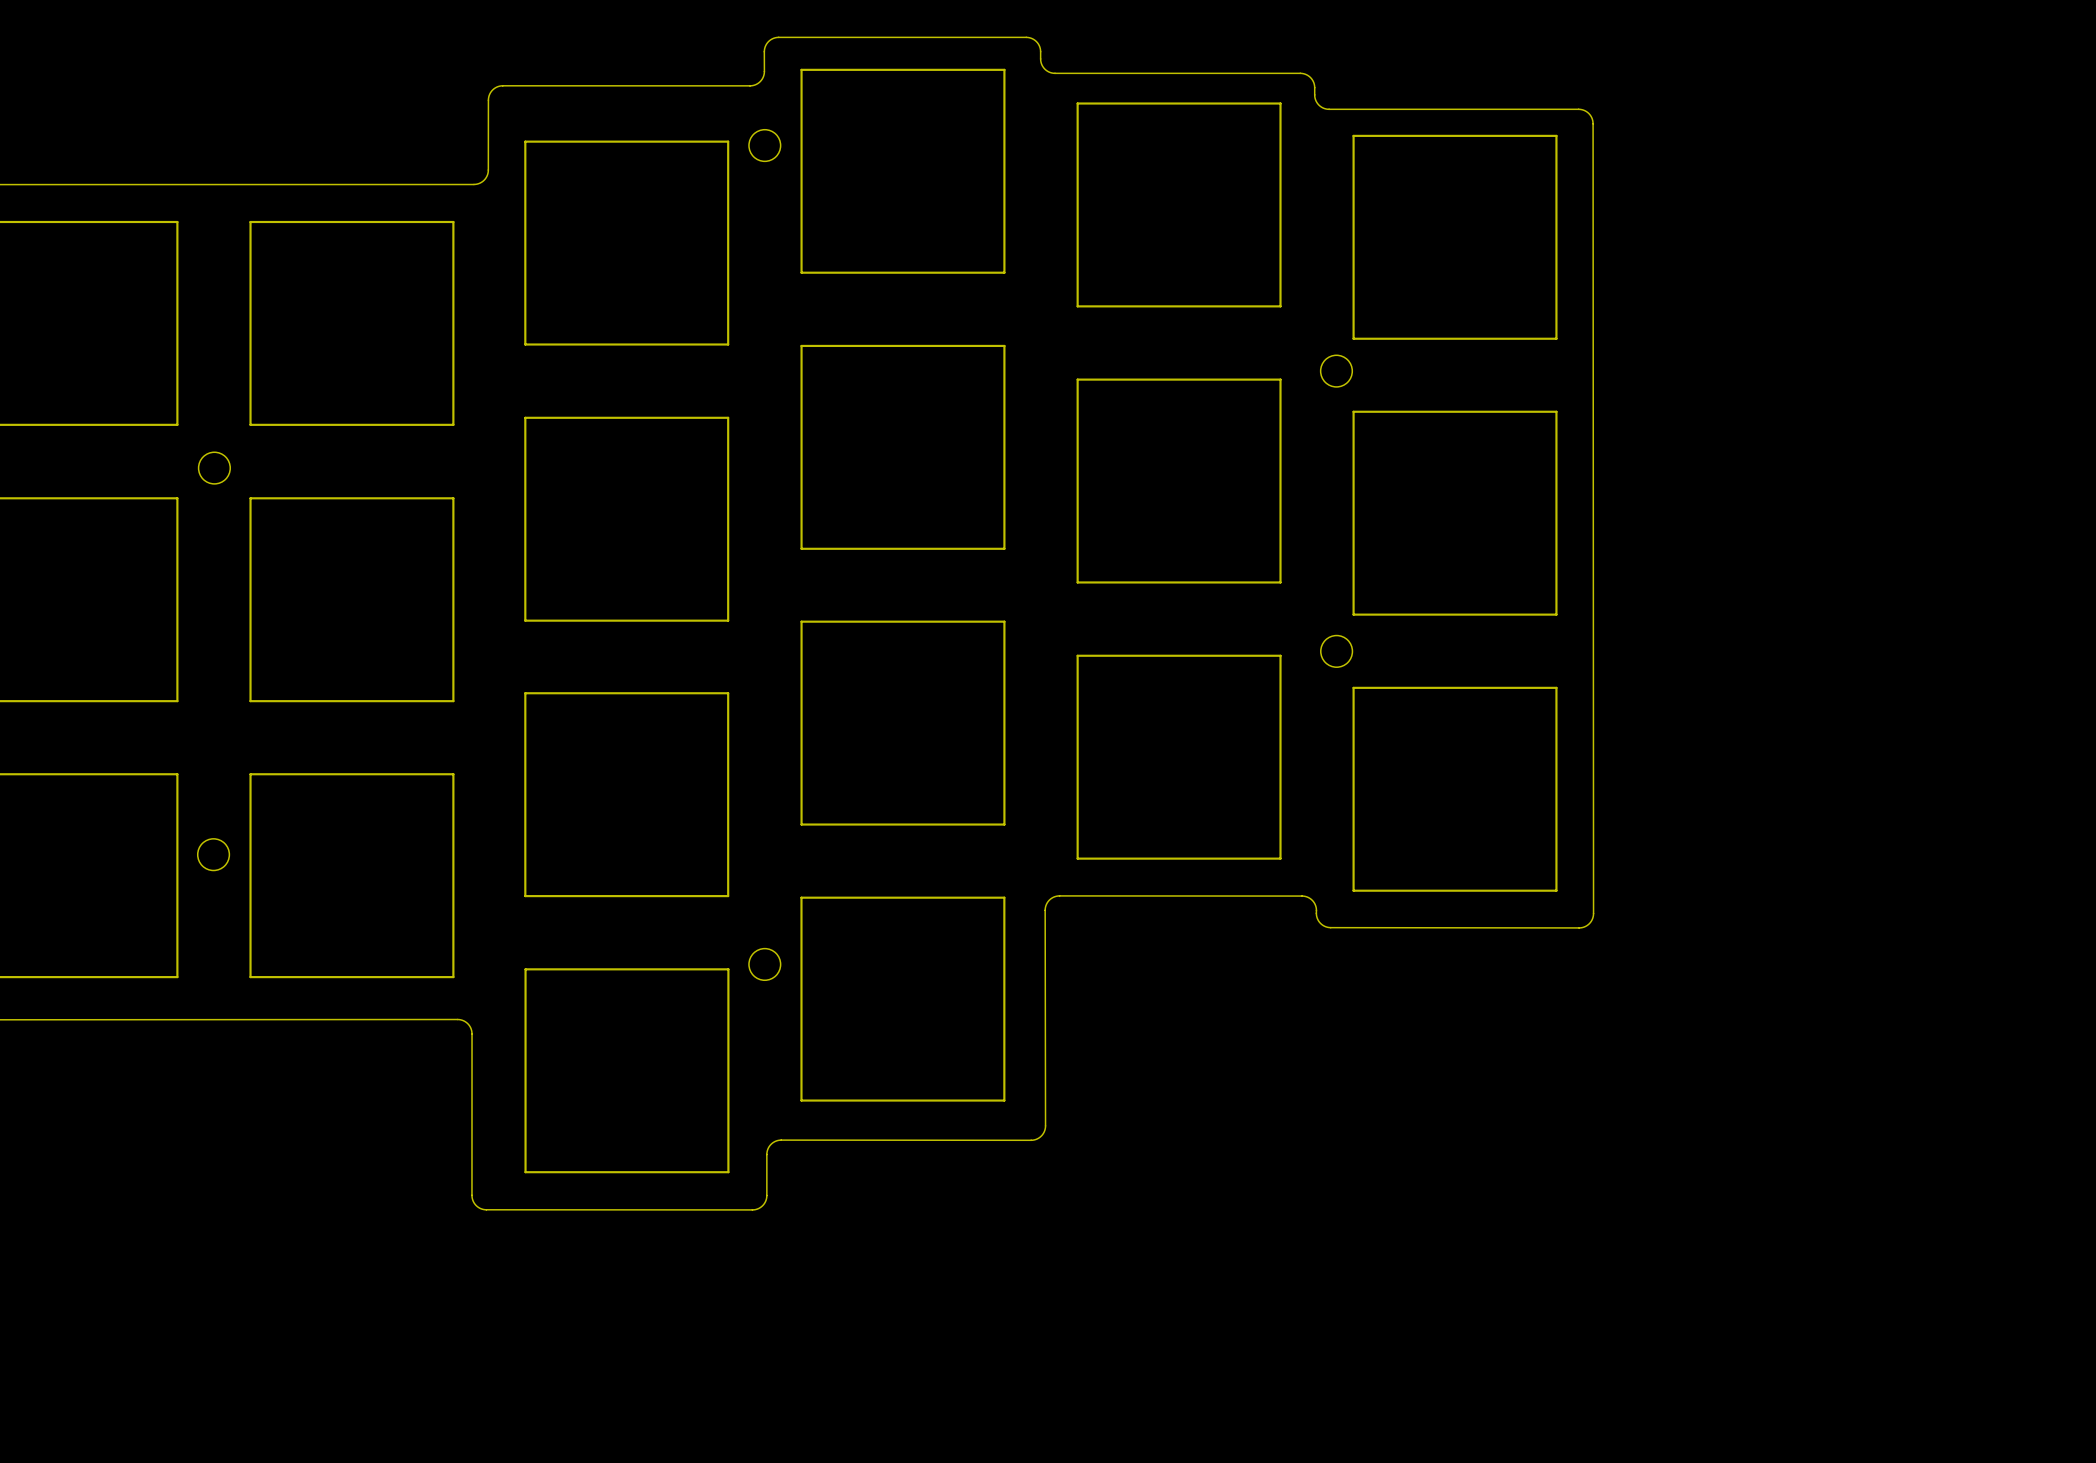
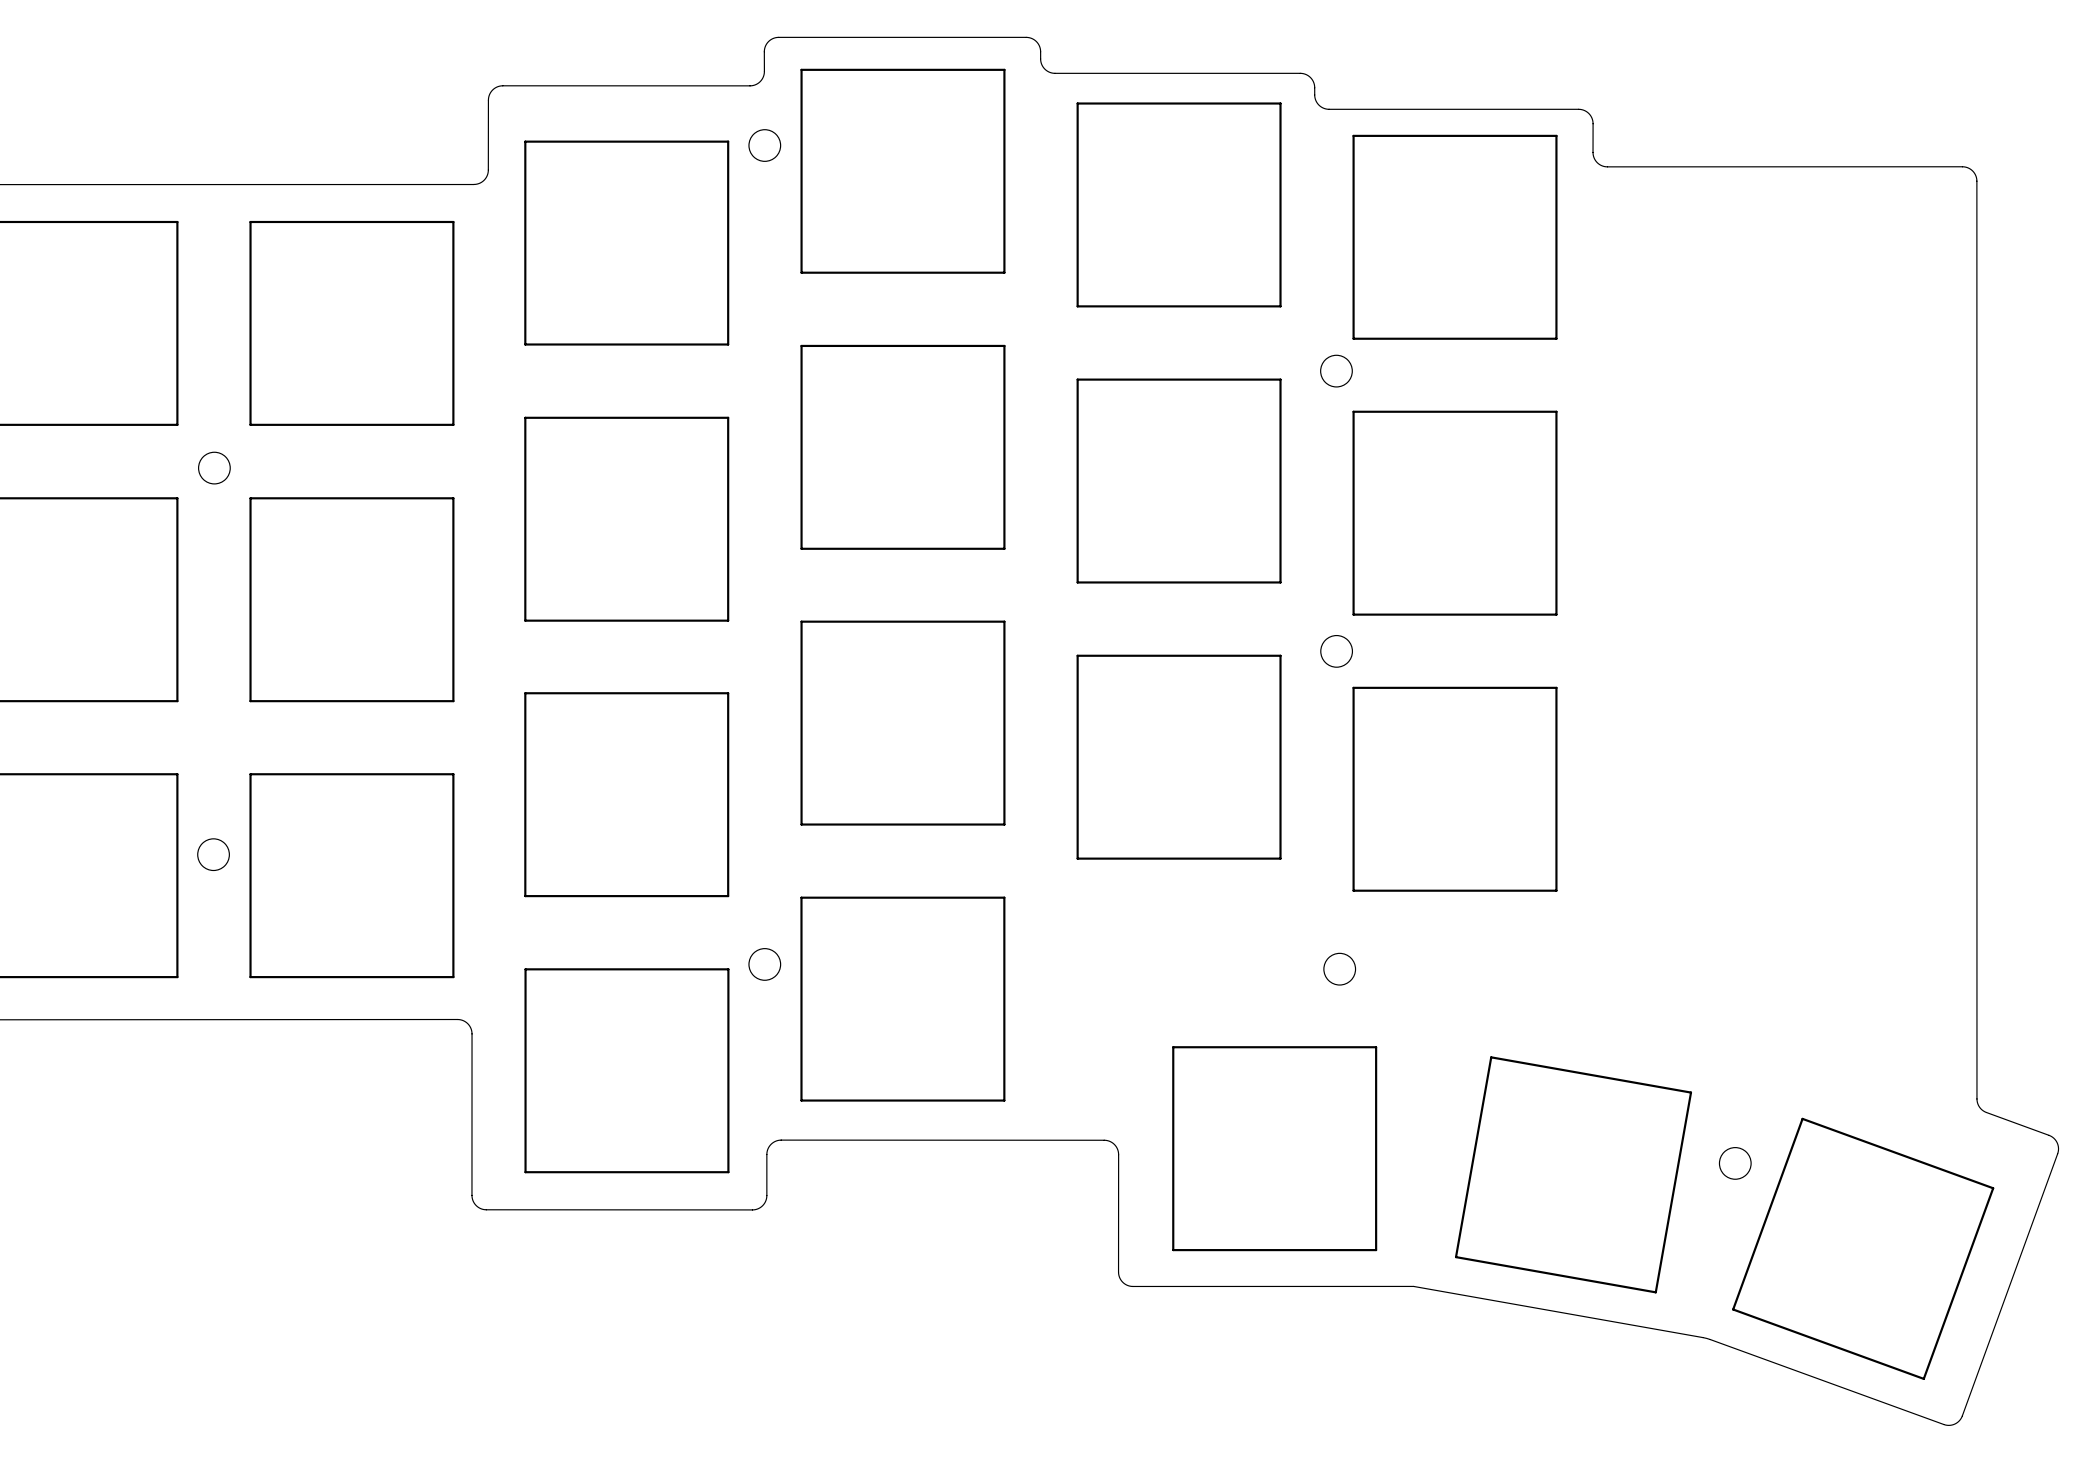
board edge: (1593, 123) (1593, 913) (1590, 922) (1579, 927) (1330, 927) (1319, 922) (1314, 902) (1303, 896) (1056, 896) (1048, 901) (1045, 908) (1045, 1125) (1040, 1137) (1031, 1140) (781, 1140) -> (1607, 166) (1962, 166) (1971, 169) (1976, 177) (1977, 1100) (1979, 1107) (1984, 1111) (2050, 1136) (2056, 1141) (2058, 1148) (1959, 1420) (1951, 1425) (1943, 1424) (1706, 1338) (1413, 1286) (1128, 1285) (1121, 1281) (1118, 1273) (1118, 1153) (1115, 1145) (1107, 1140) (781, 1140)
board edge: none -> (1593, 123) (1593, 157) (1599, 164) (1607, 166)
drawing: none -> [1323, 953, 1356, 986]
drawing: none -> [1172, 1046, 1378, 1252]
drawing: none -> [1454, 1056, 1693, 1294]
drawing: none -> [1719, 1117, 1995, 1380]

